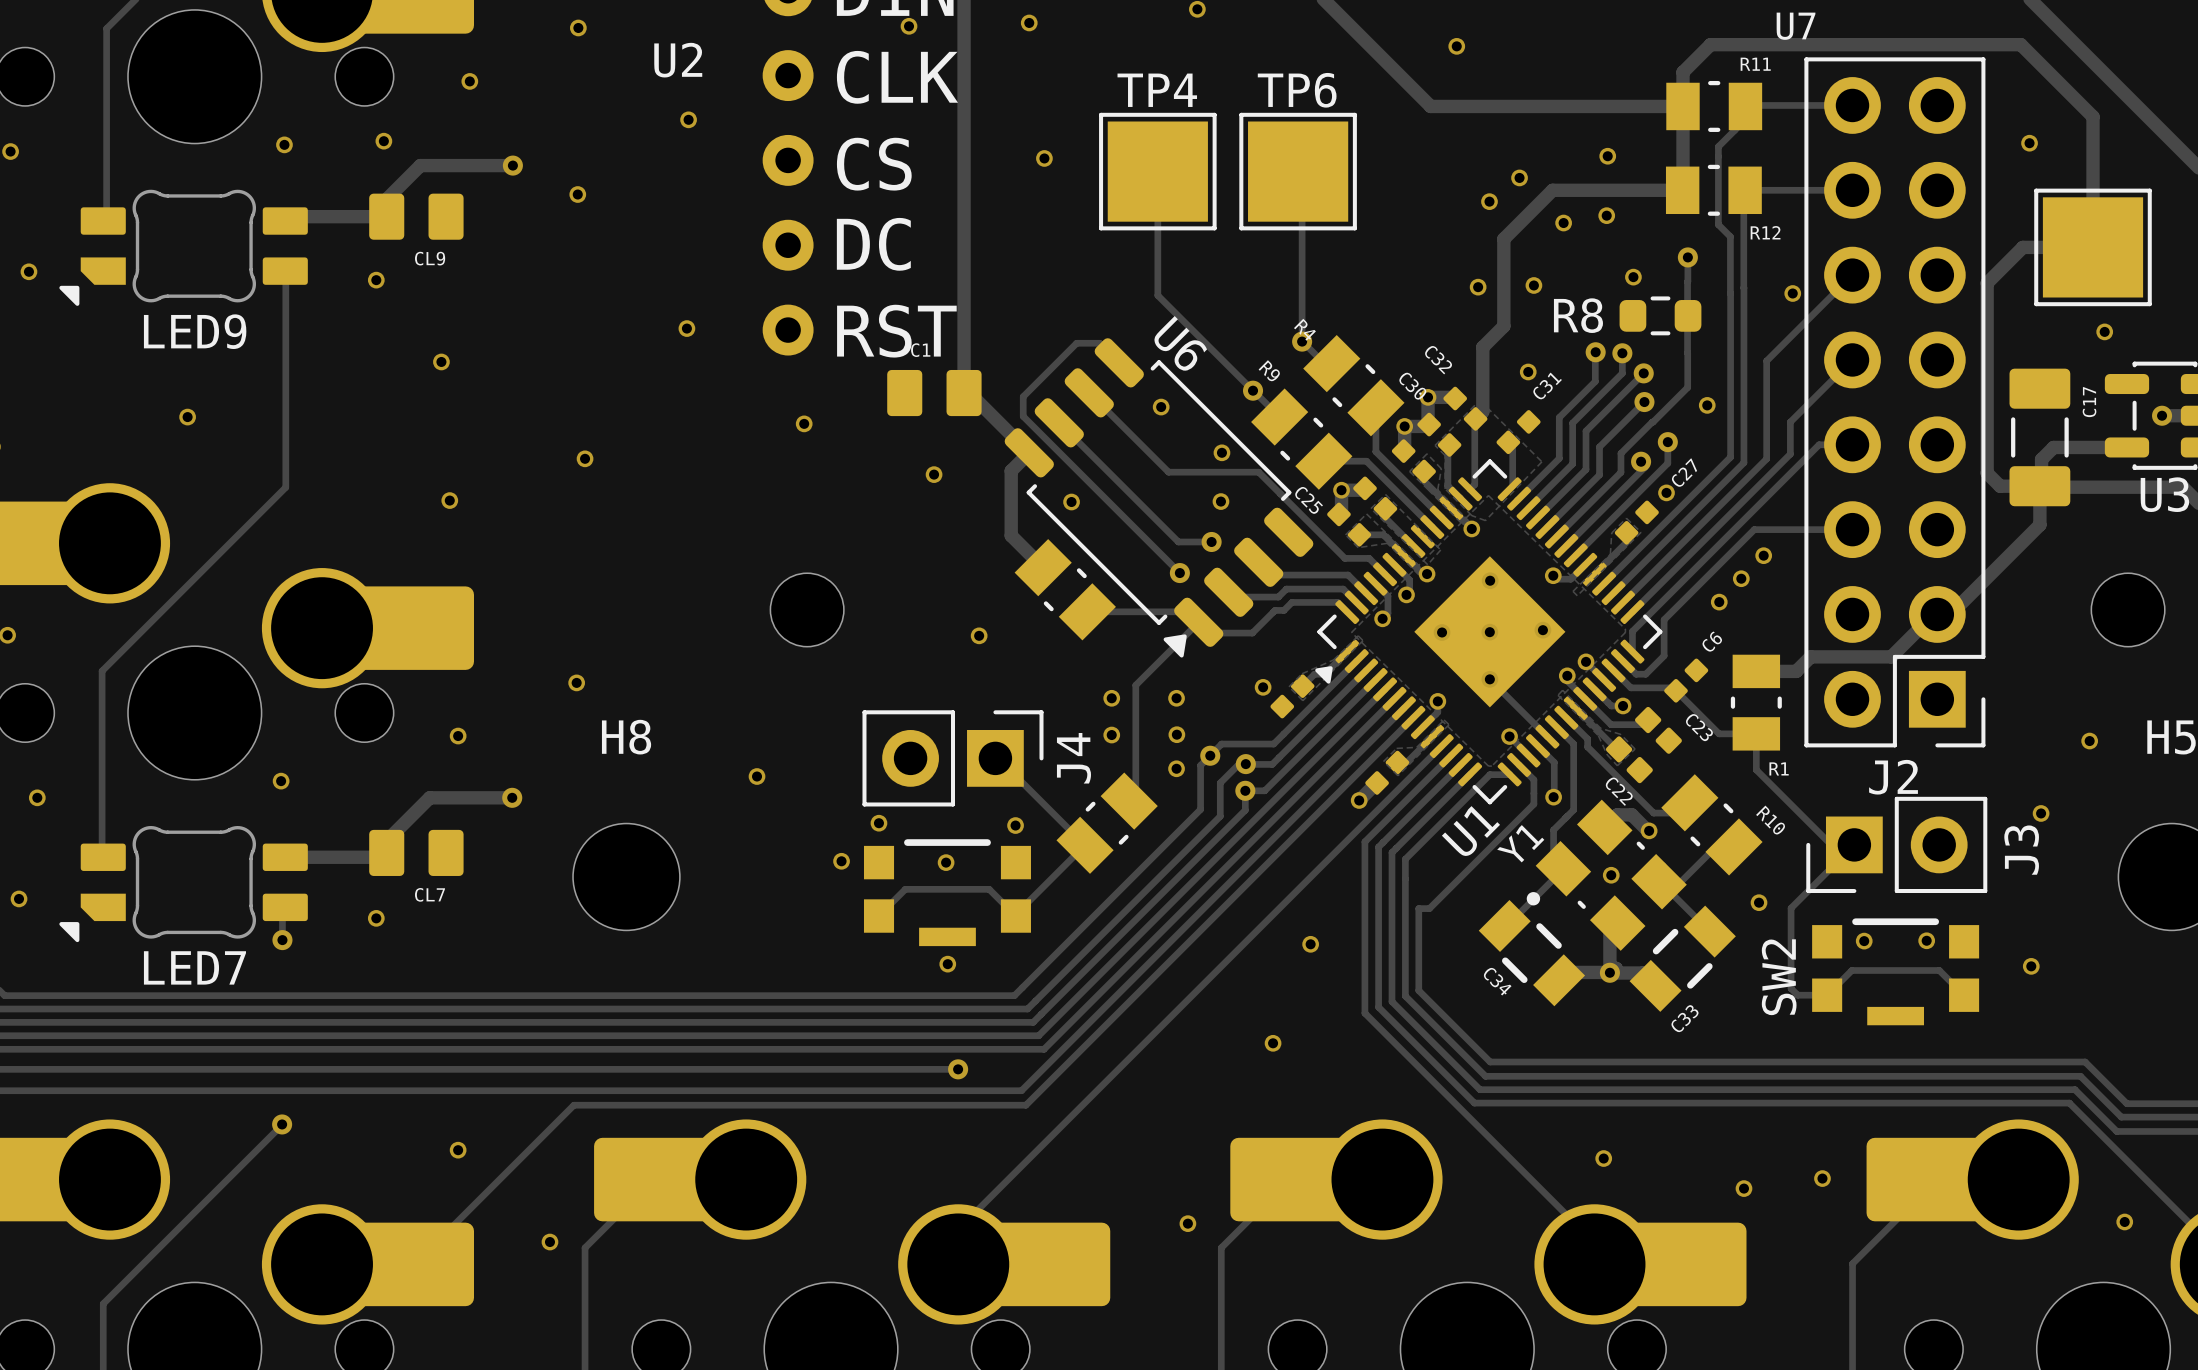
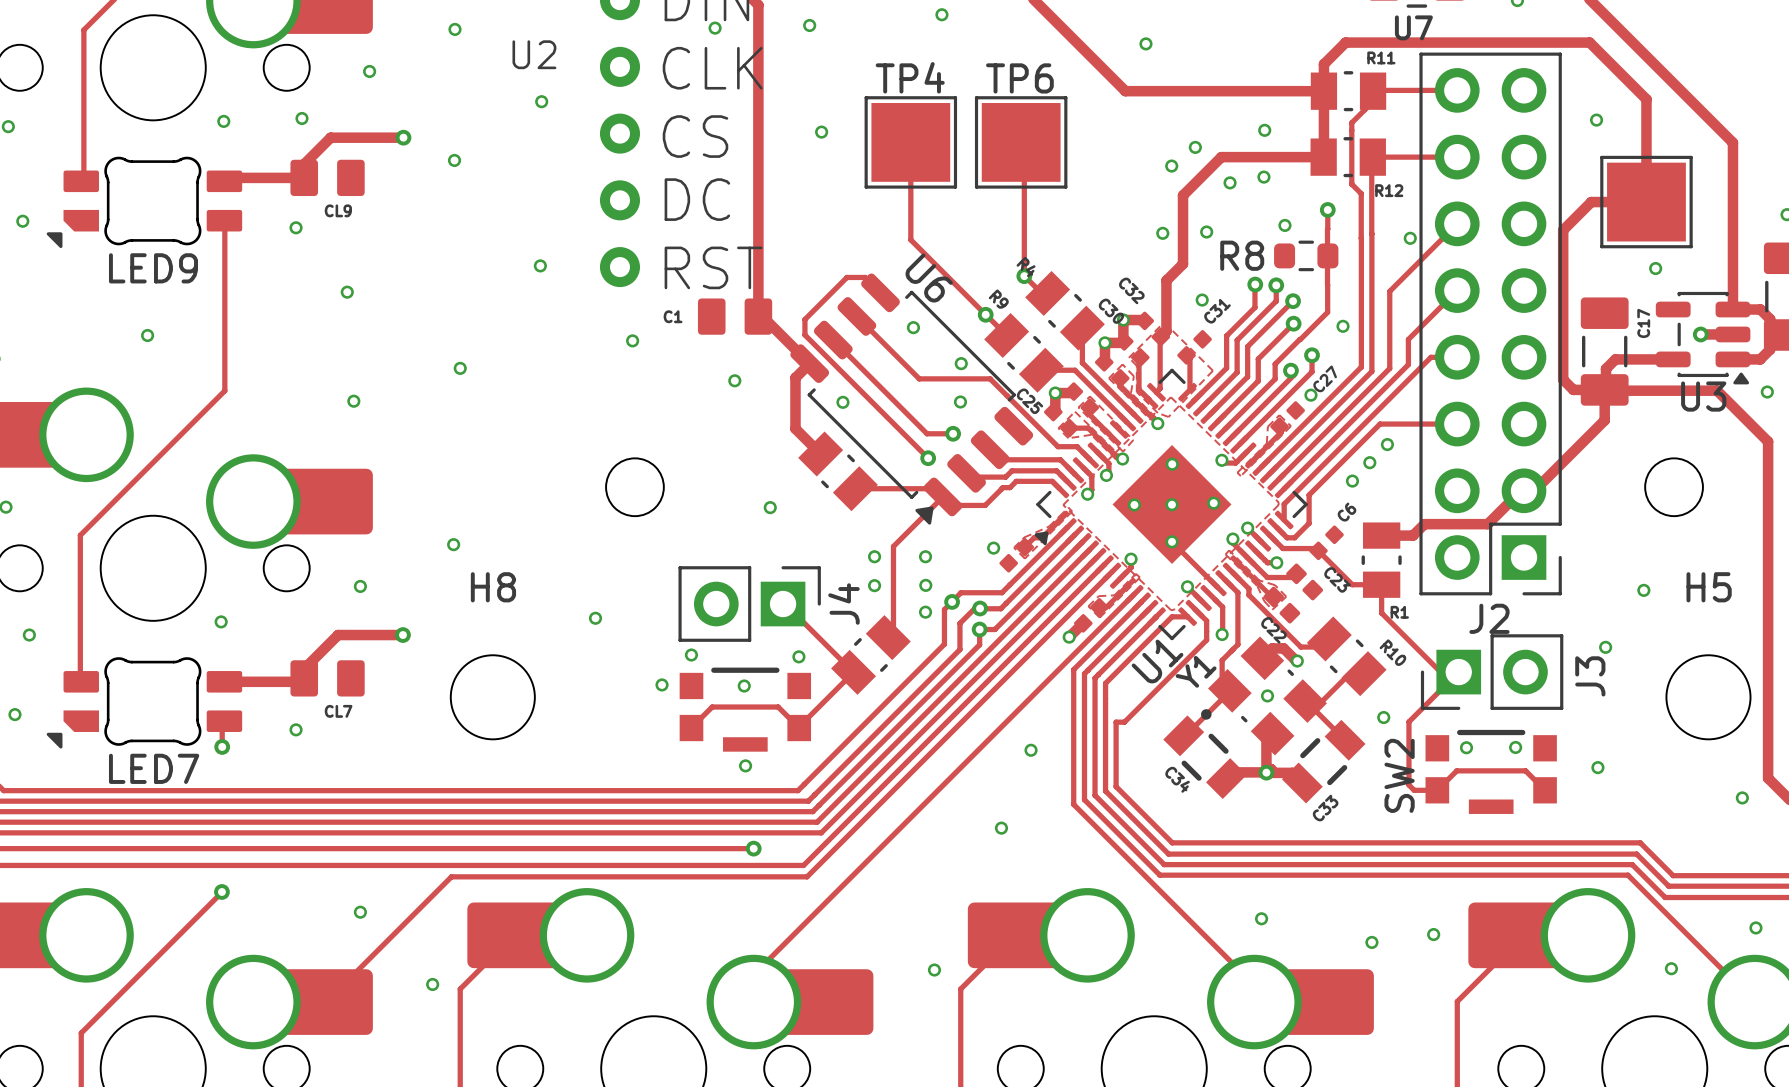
C1 name position: C1 (920, 350) -> C1 (673, 316)

